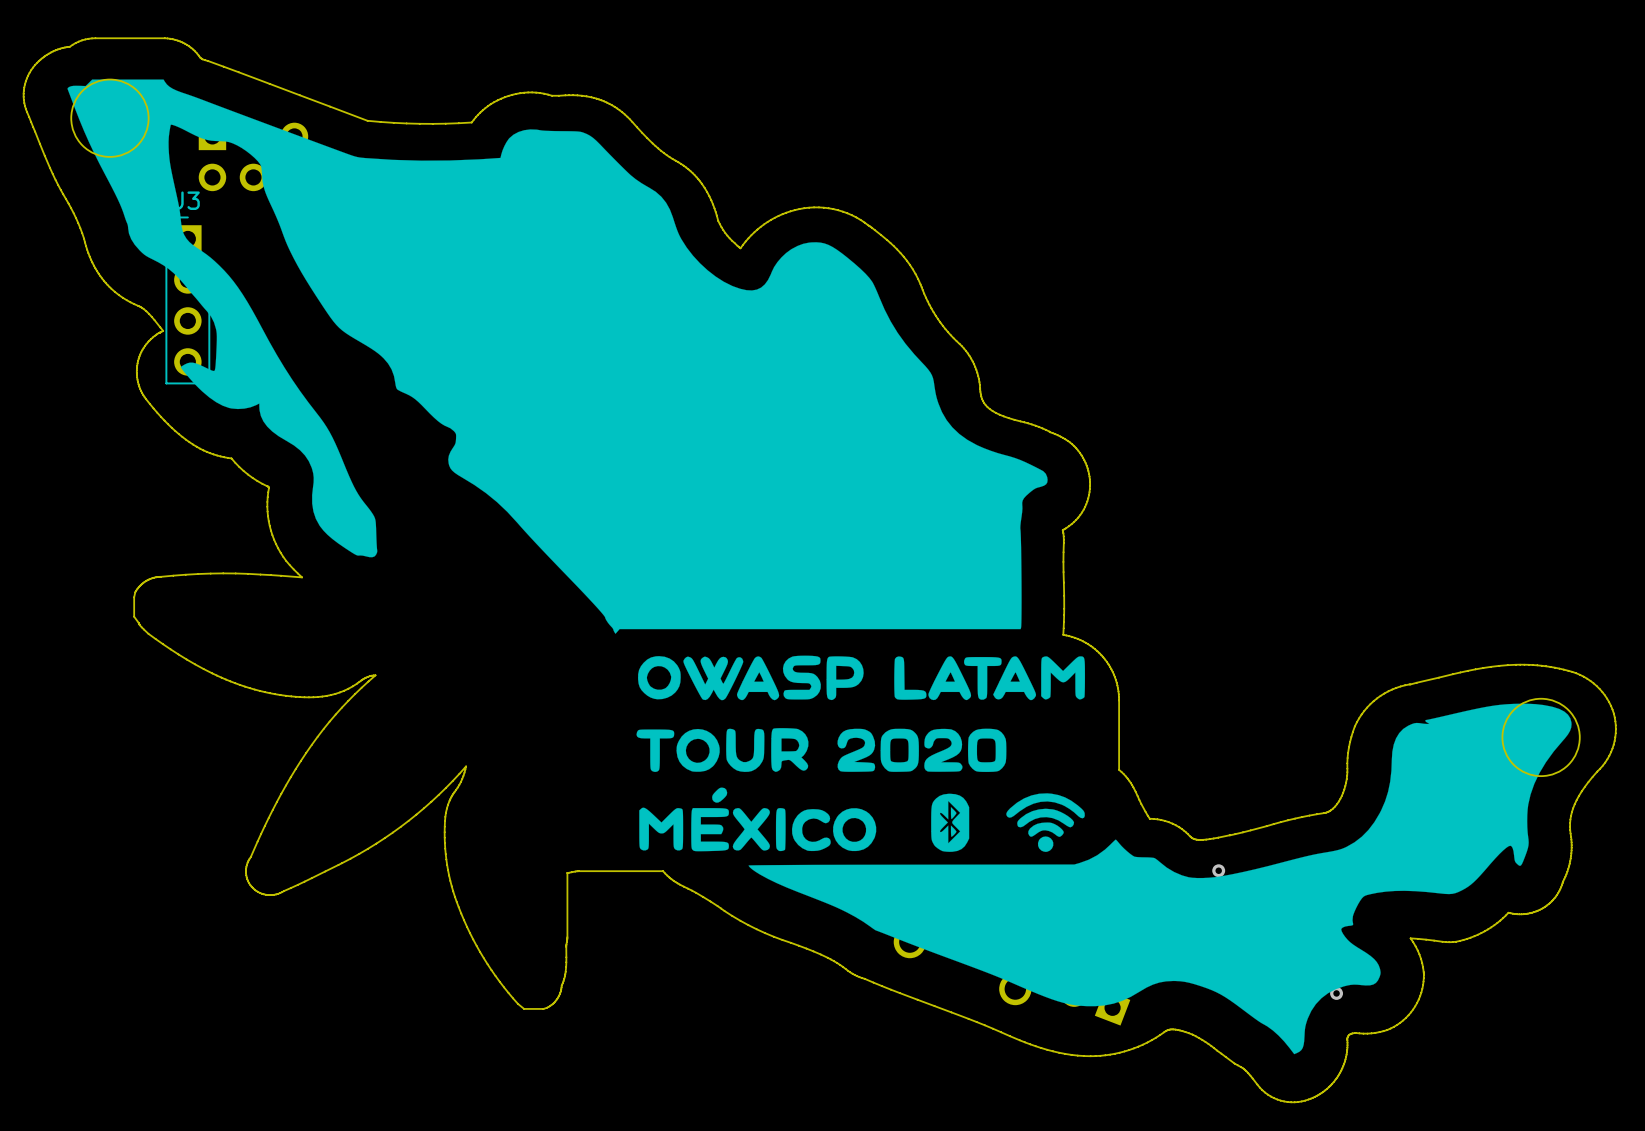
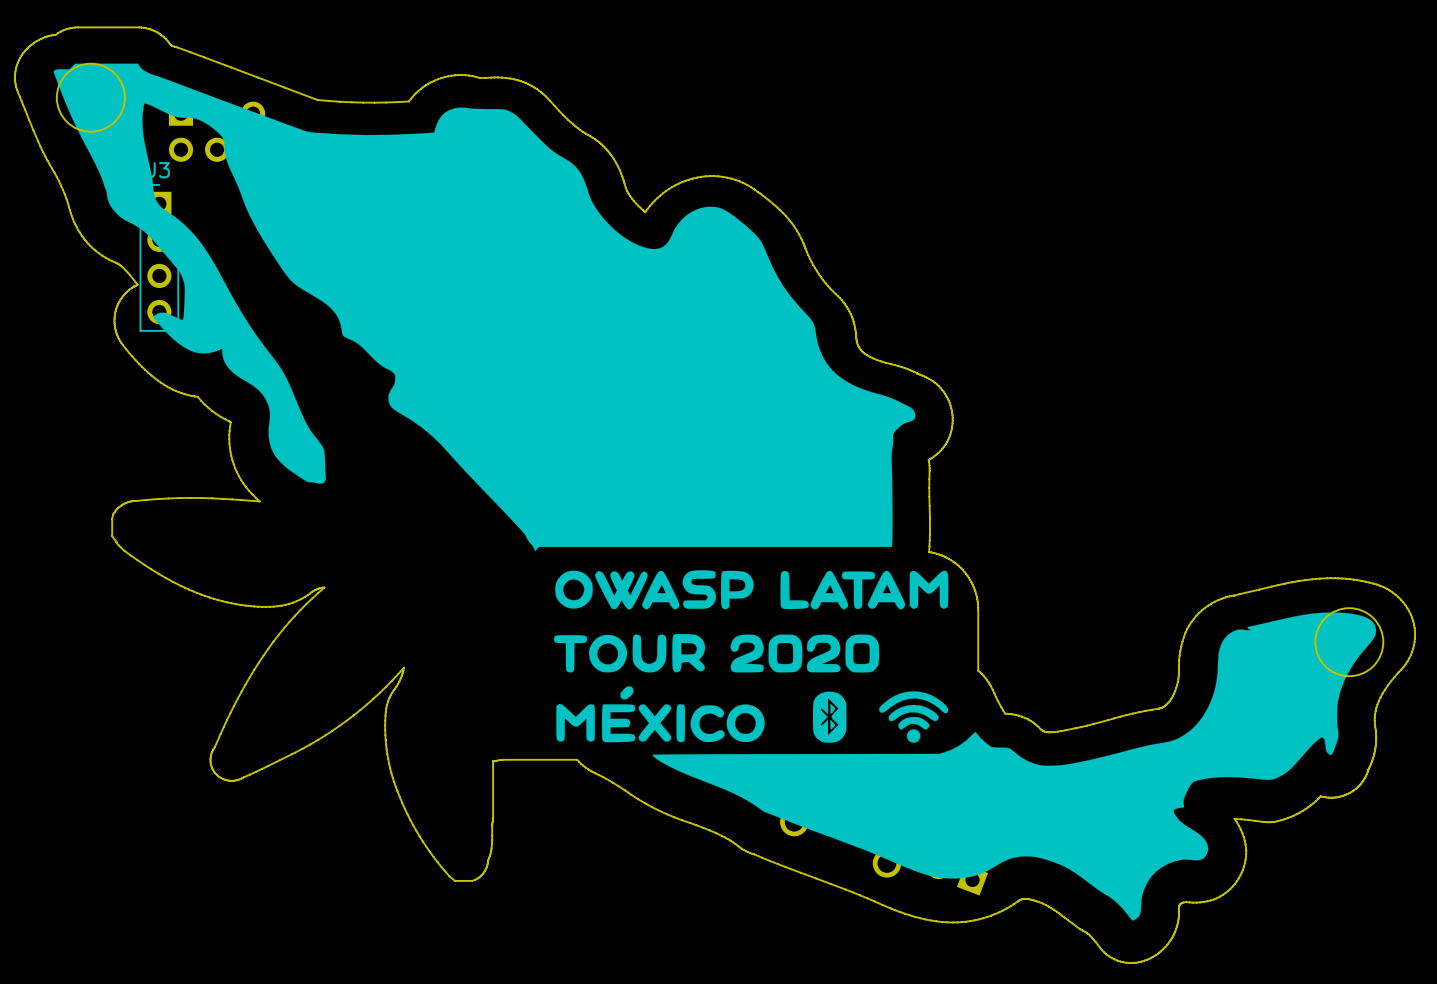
via: (1218, 870) -> none
via: (1336, 993) -> none

